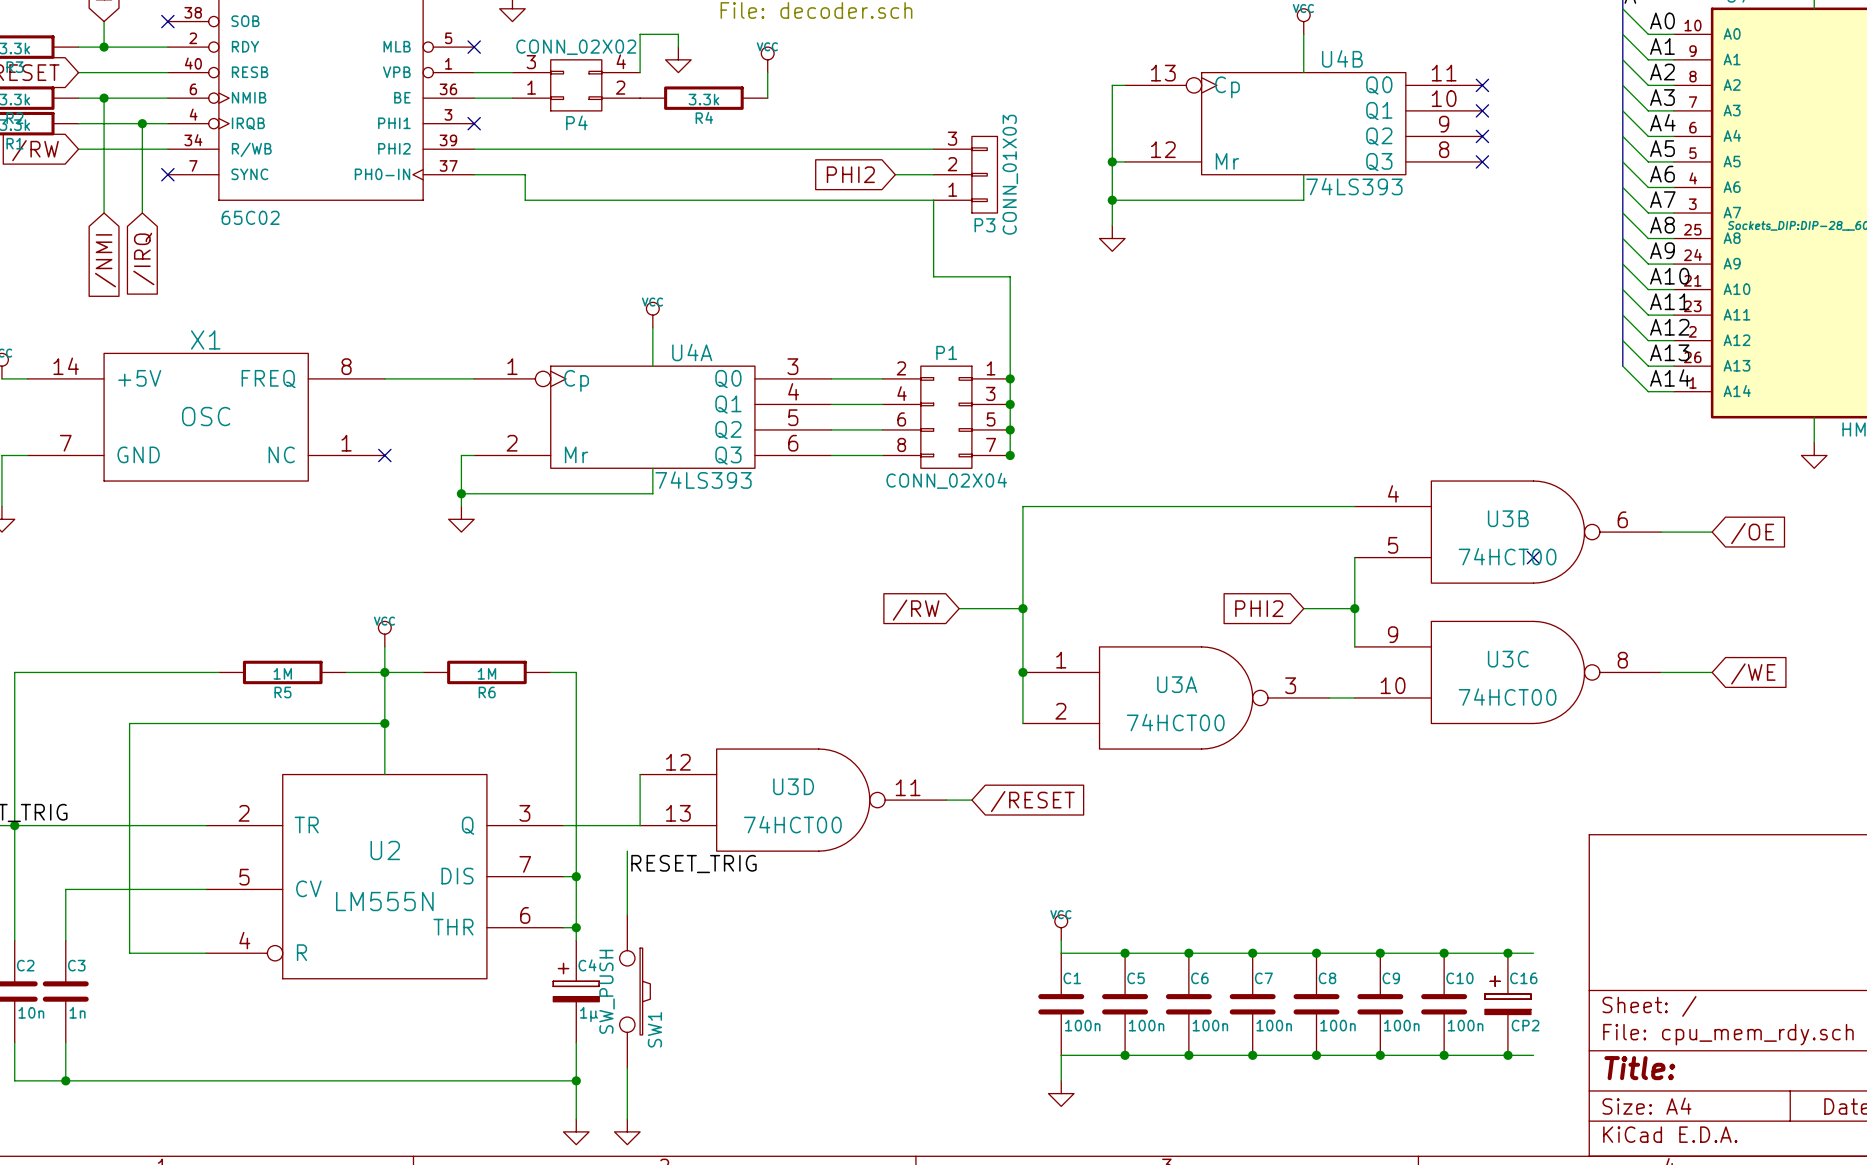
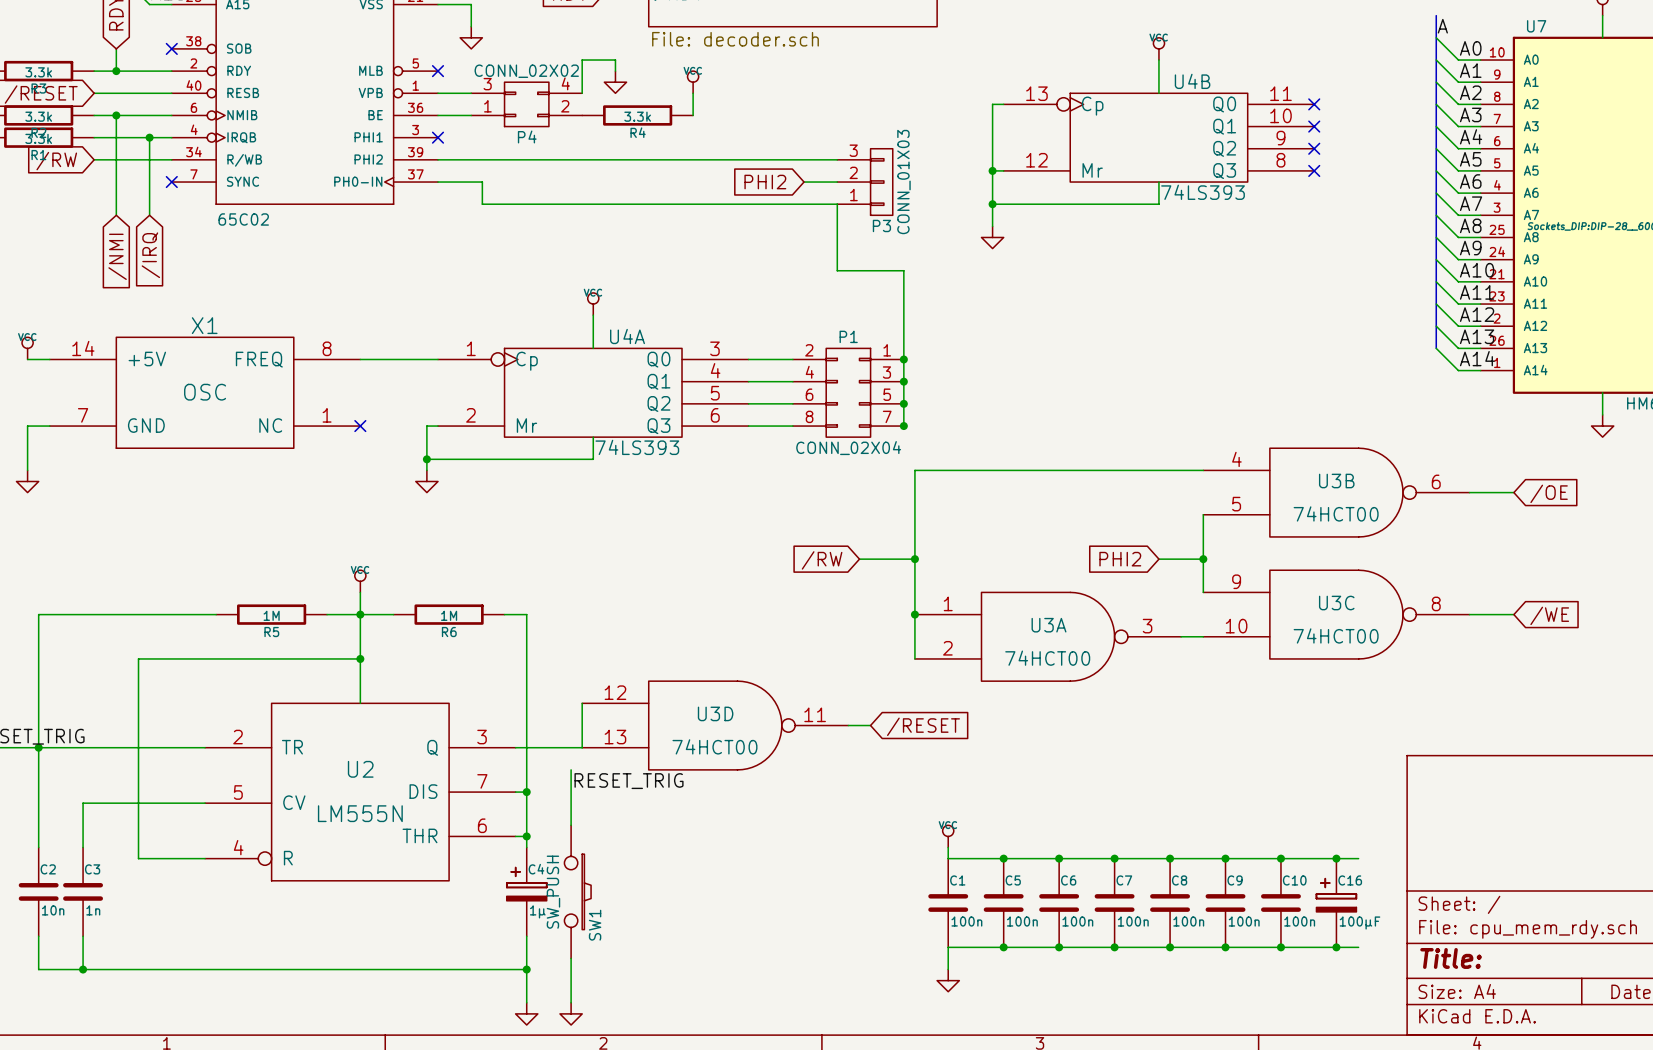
no-connect mark: (1533, 557) -> none
C16 value: CP2 (1525, 1025) -> 100µF (1359, 922)

